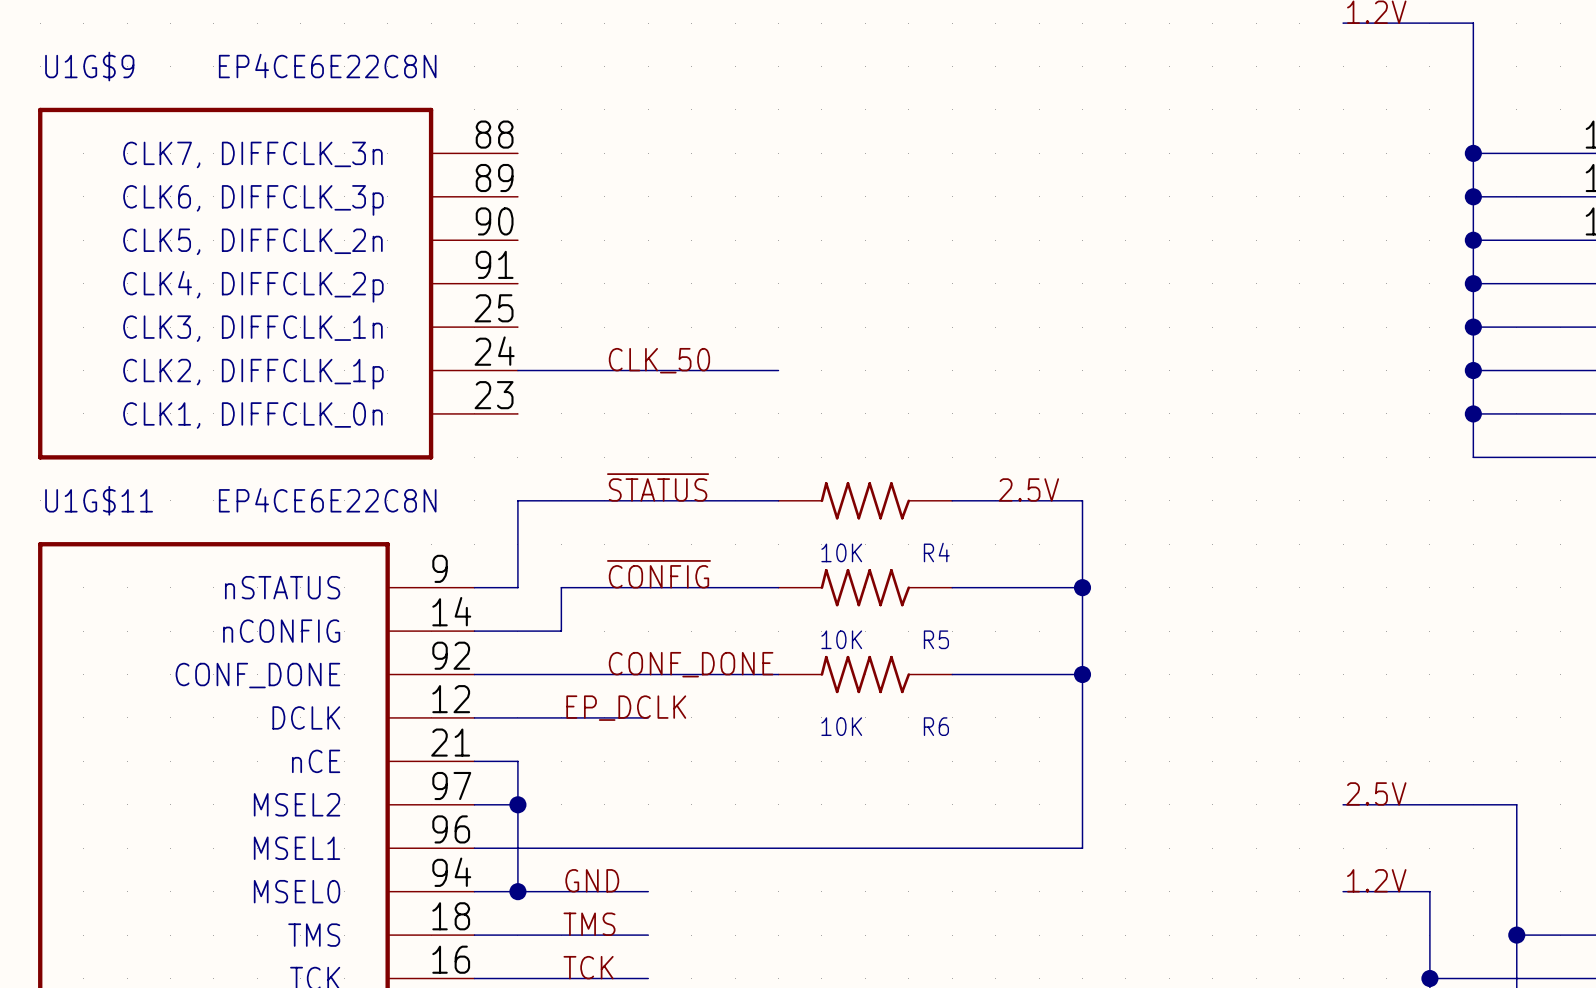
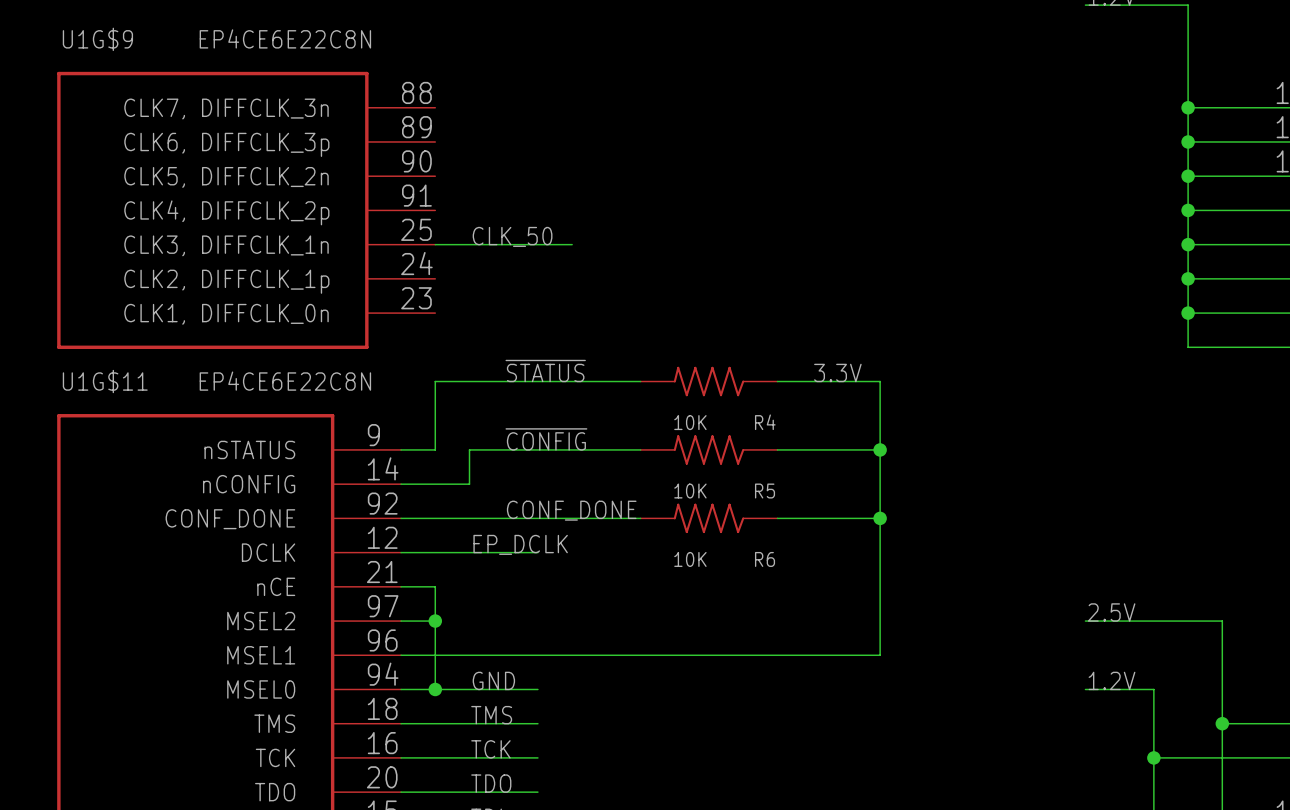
wire: none -> (435, 244) (572, 244)
label position: CLK_50 (659, 360) -> CLK_50 (512, 236)
wire: (517, 370) (778, 370) -> none
label: 2.5V (1028, 489) -> 3.3V (837, 372)

